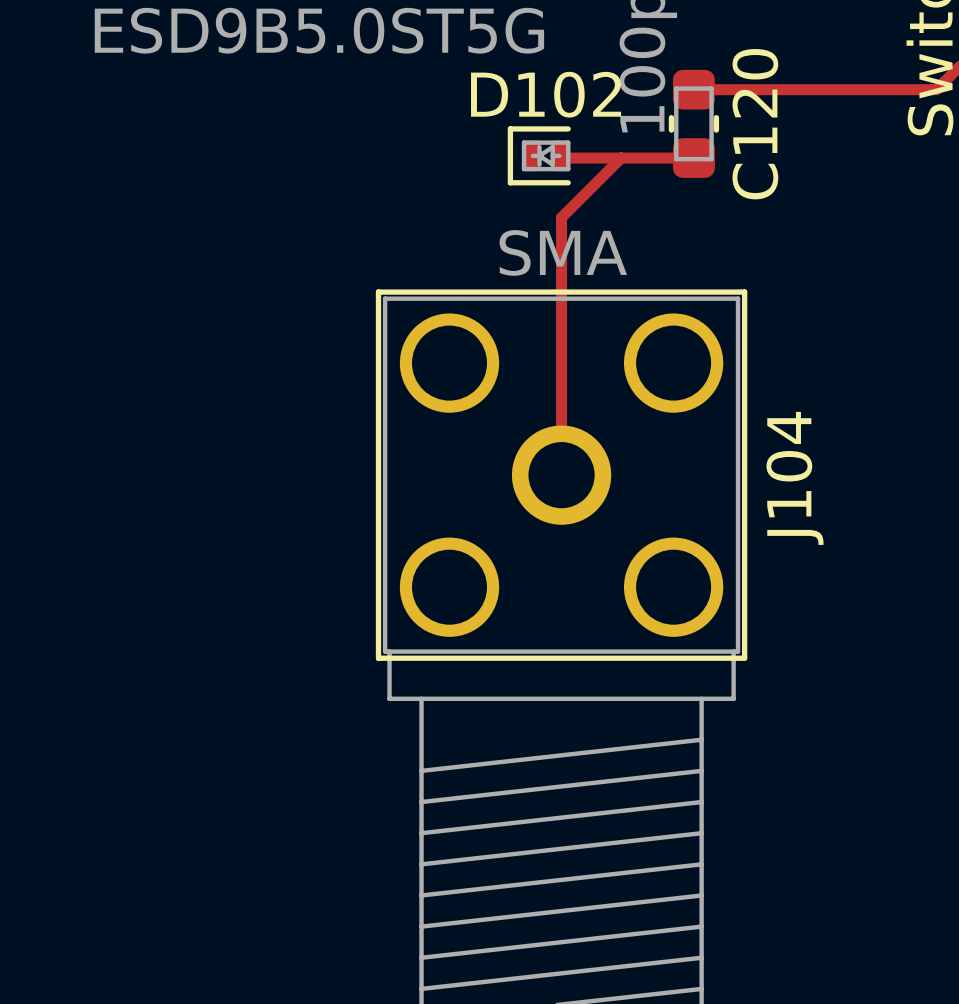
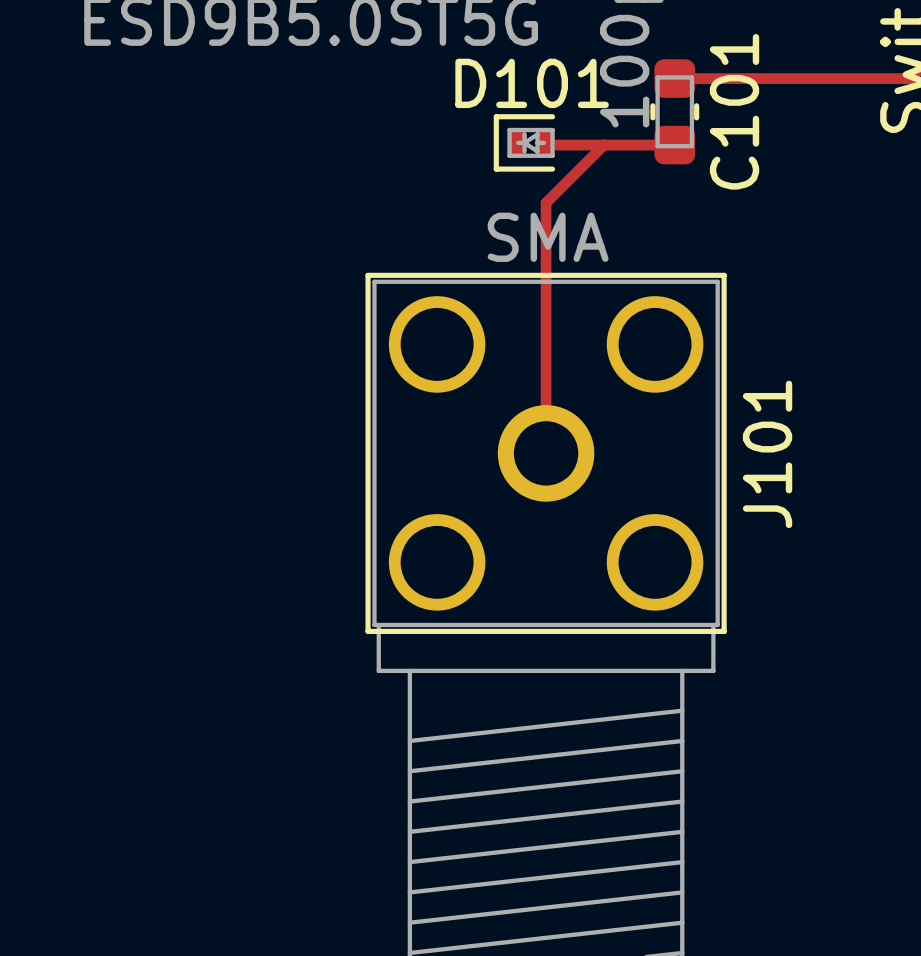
D102 name: D102 (546, 94) -> D101 (532, 83)
C120 name: C120 (755, 124) -> C101 (734, 111)
J104 name: J104 (794, 478) -> J101 (767, 454)

